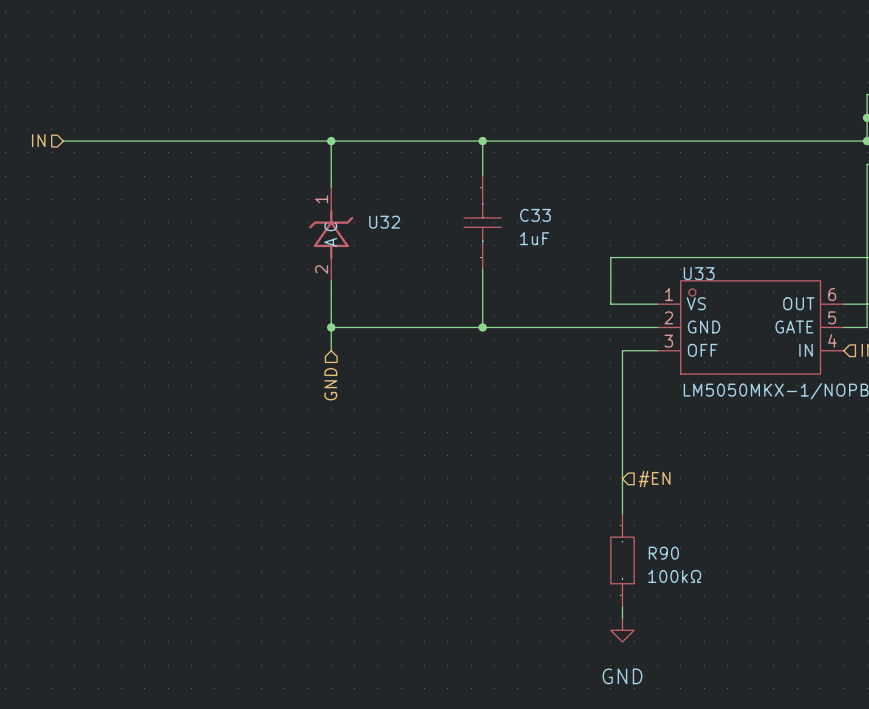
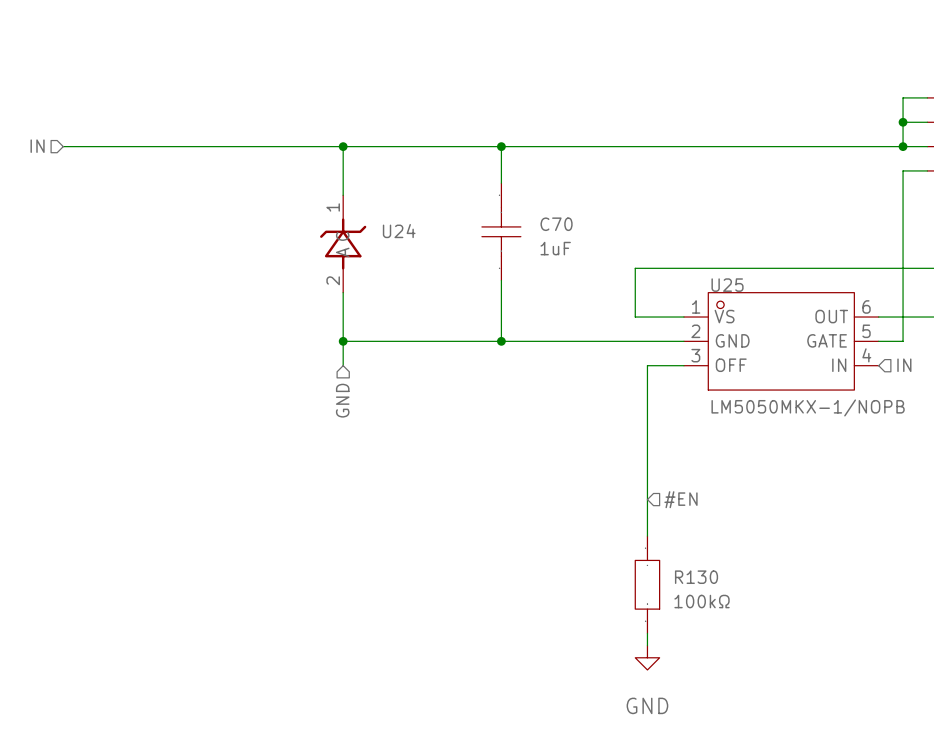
C33 name: C33 (535, 215) -> C70 (556, 224)
U32 name: U32 (384, 222) -> U24 (399, 231)
U33 name: U33 (699, 273) -> U25 (727, 285)
R90 name: R90 (663, 553) -> R130 (696, 577)

